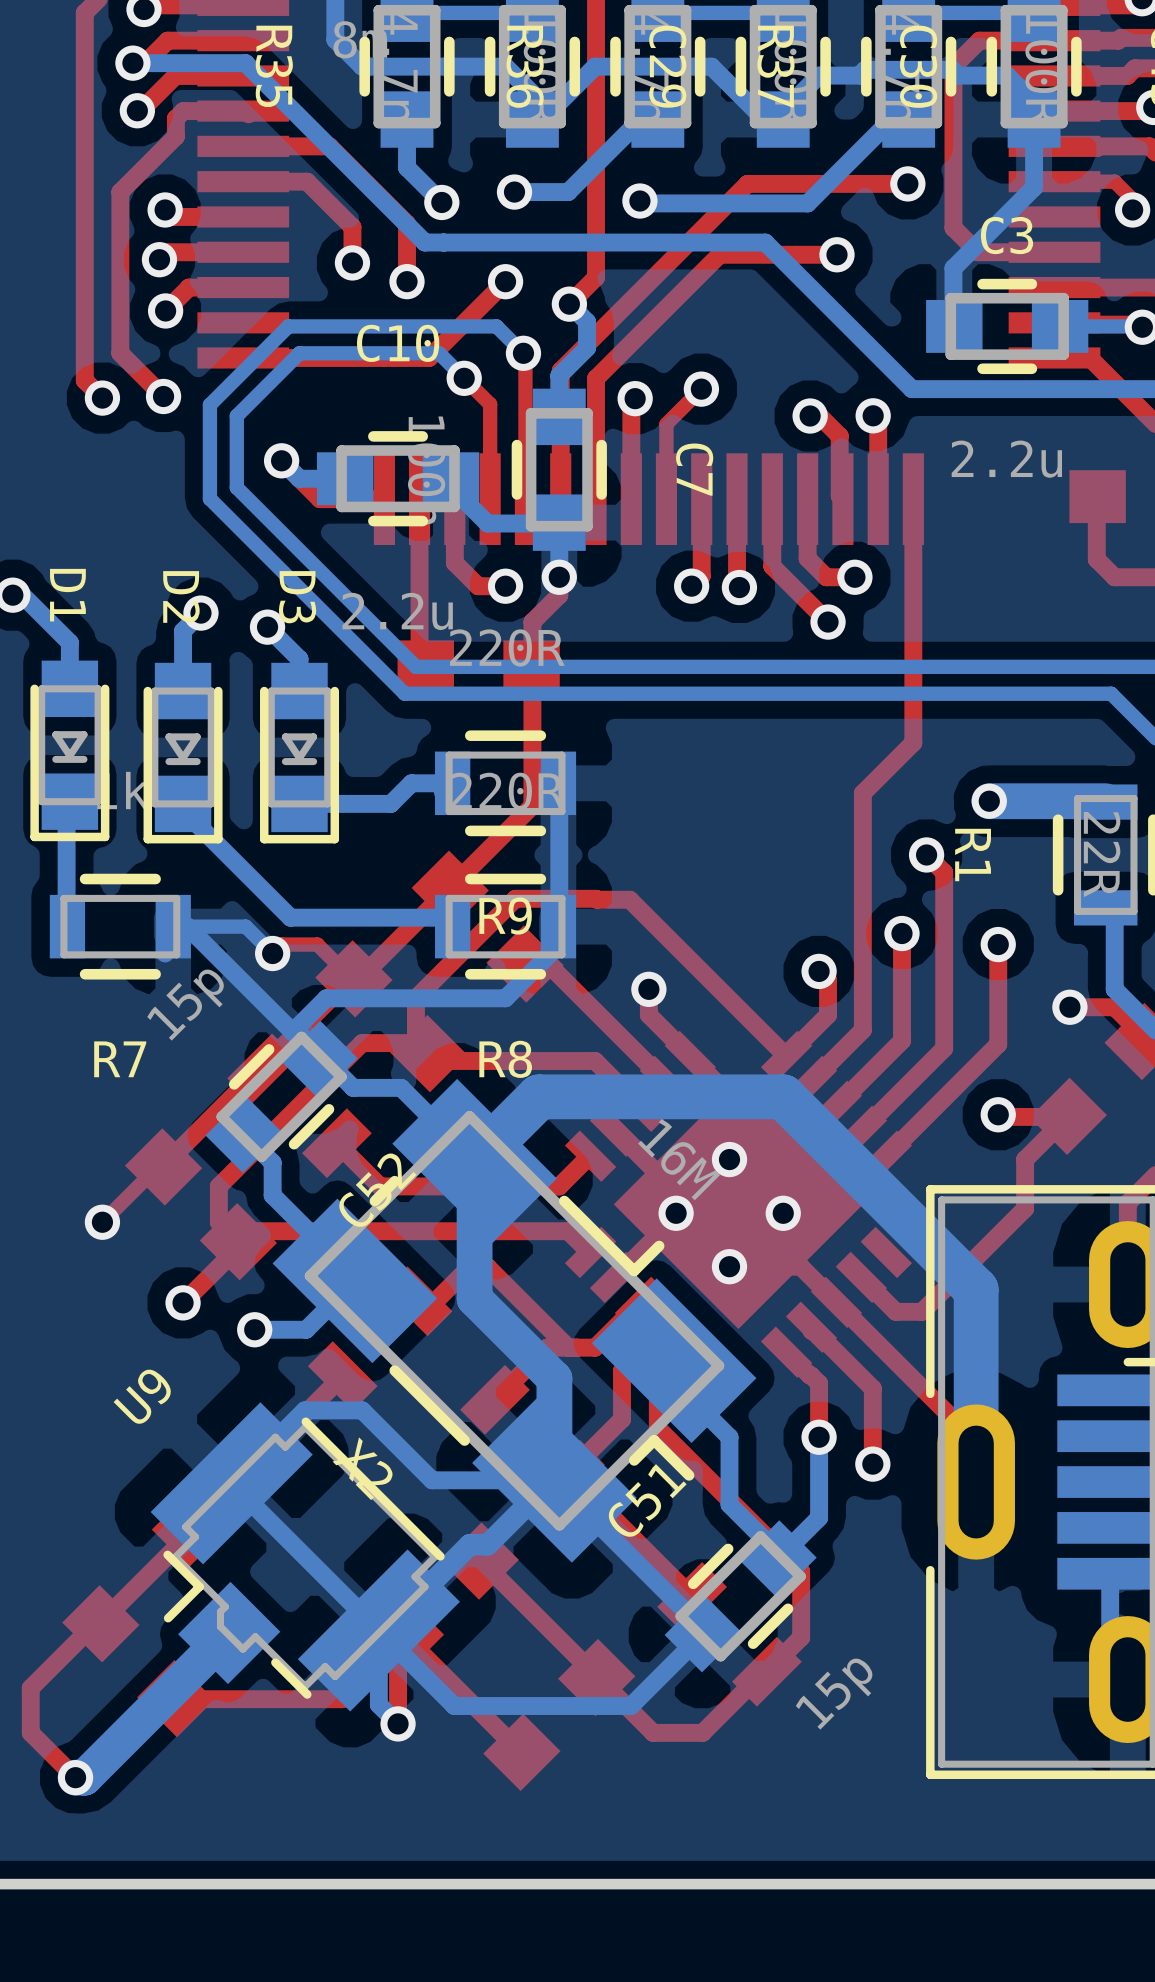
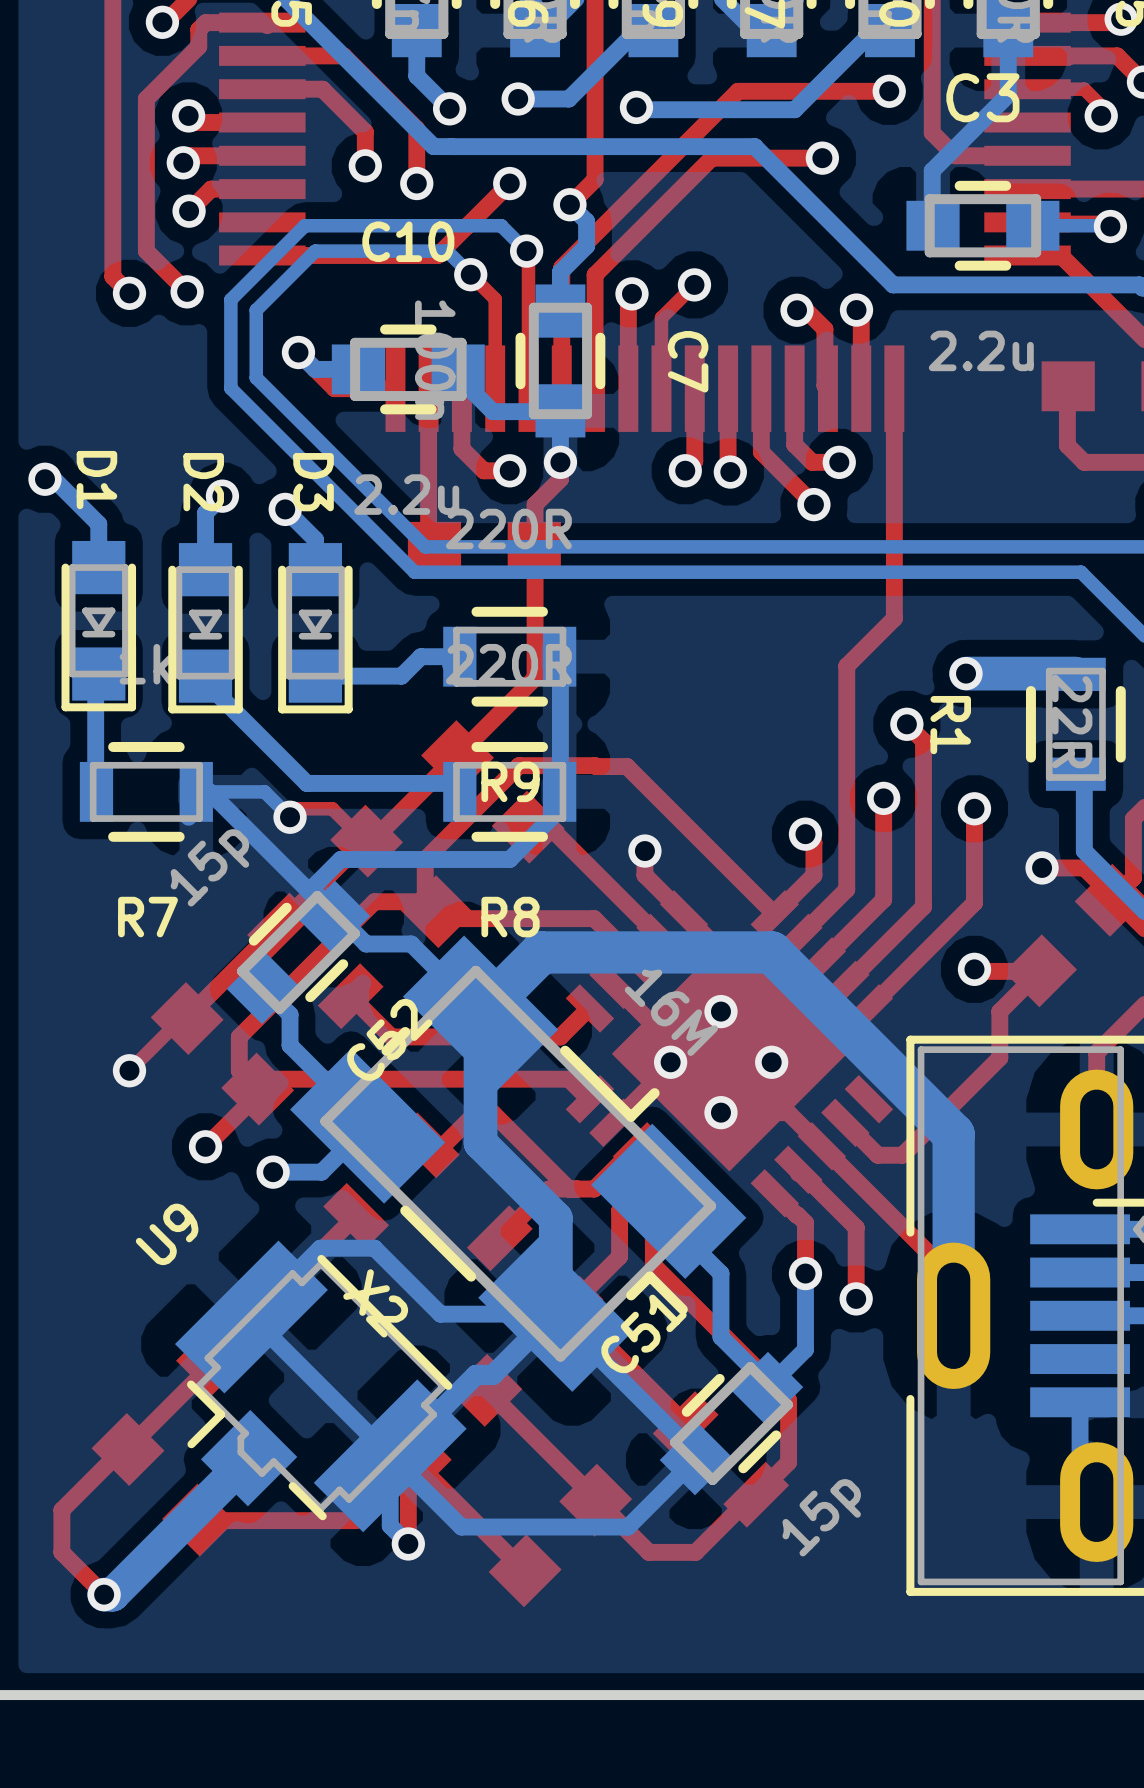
C3 name position: C3 (1007, 235) -> C3 (982, 97)

